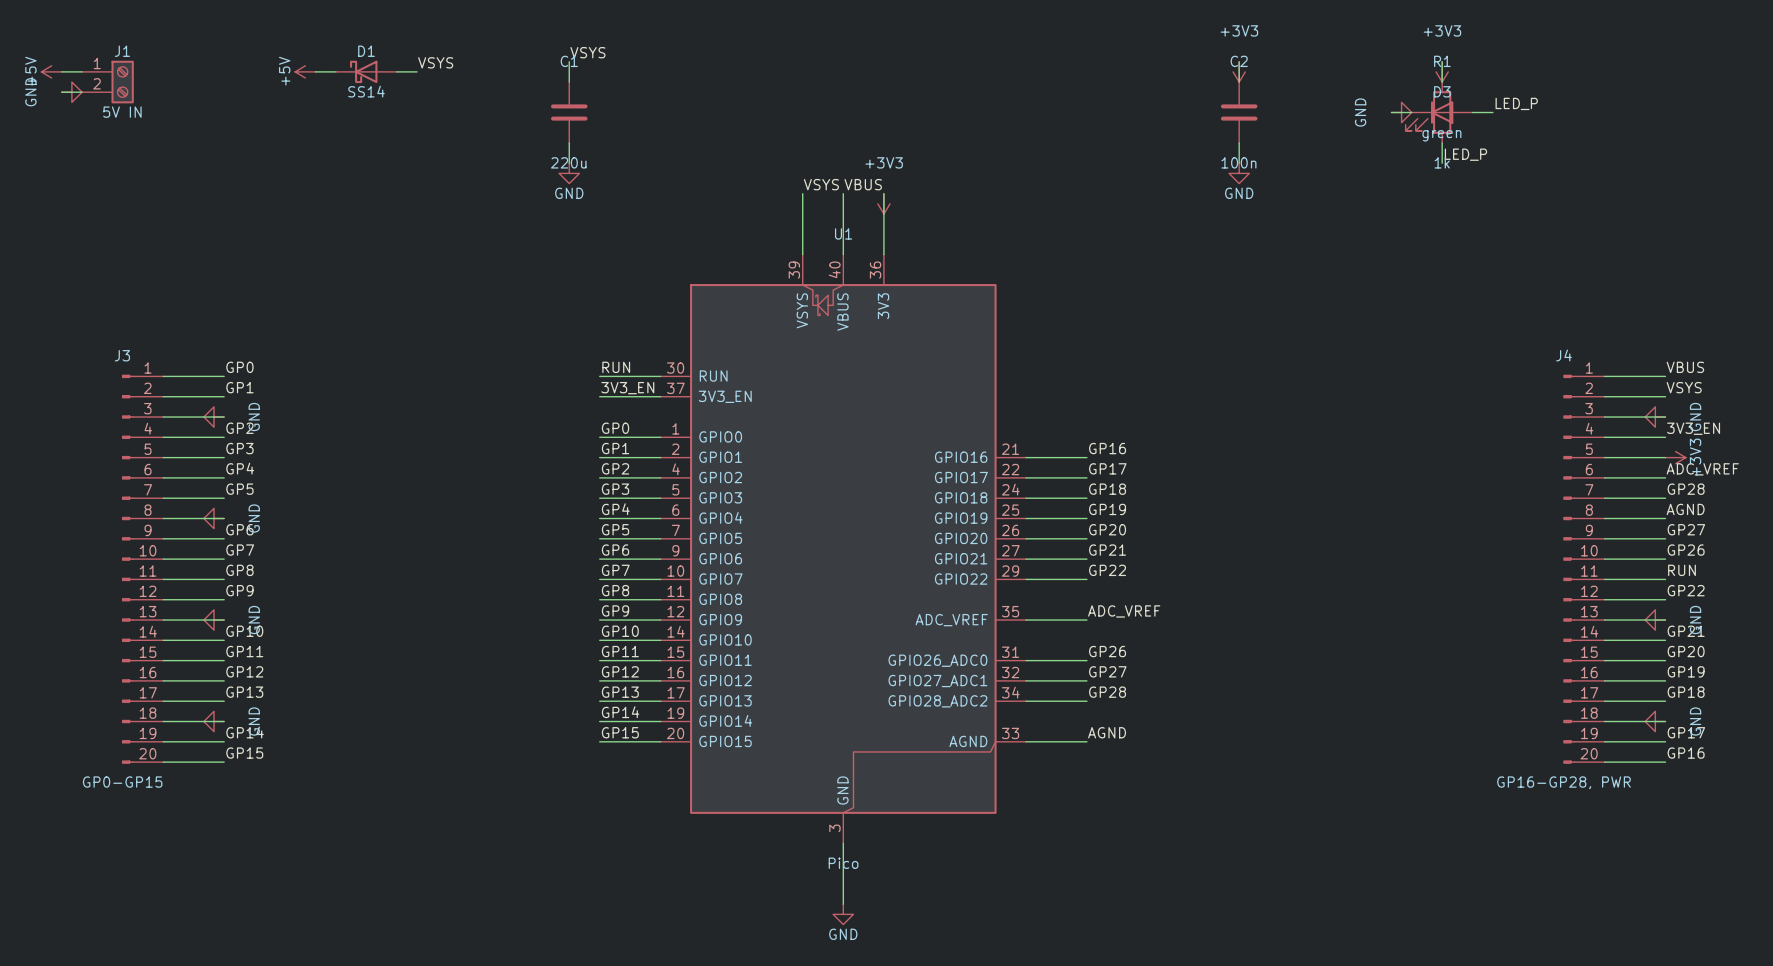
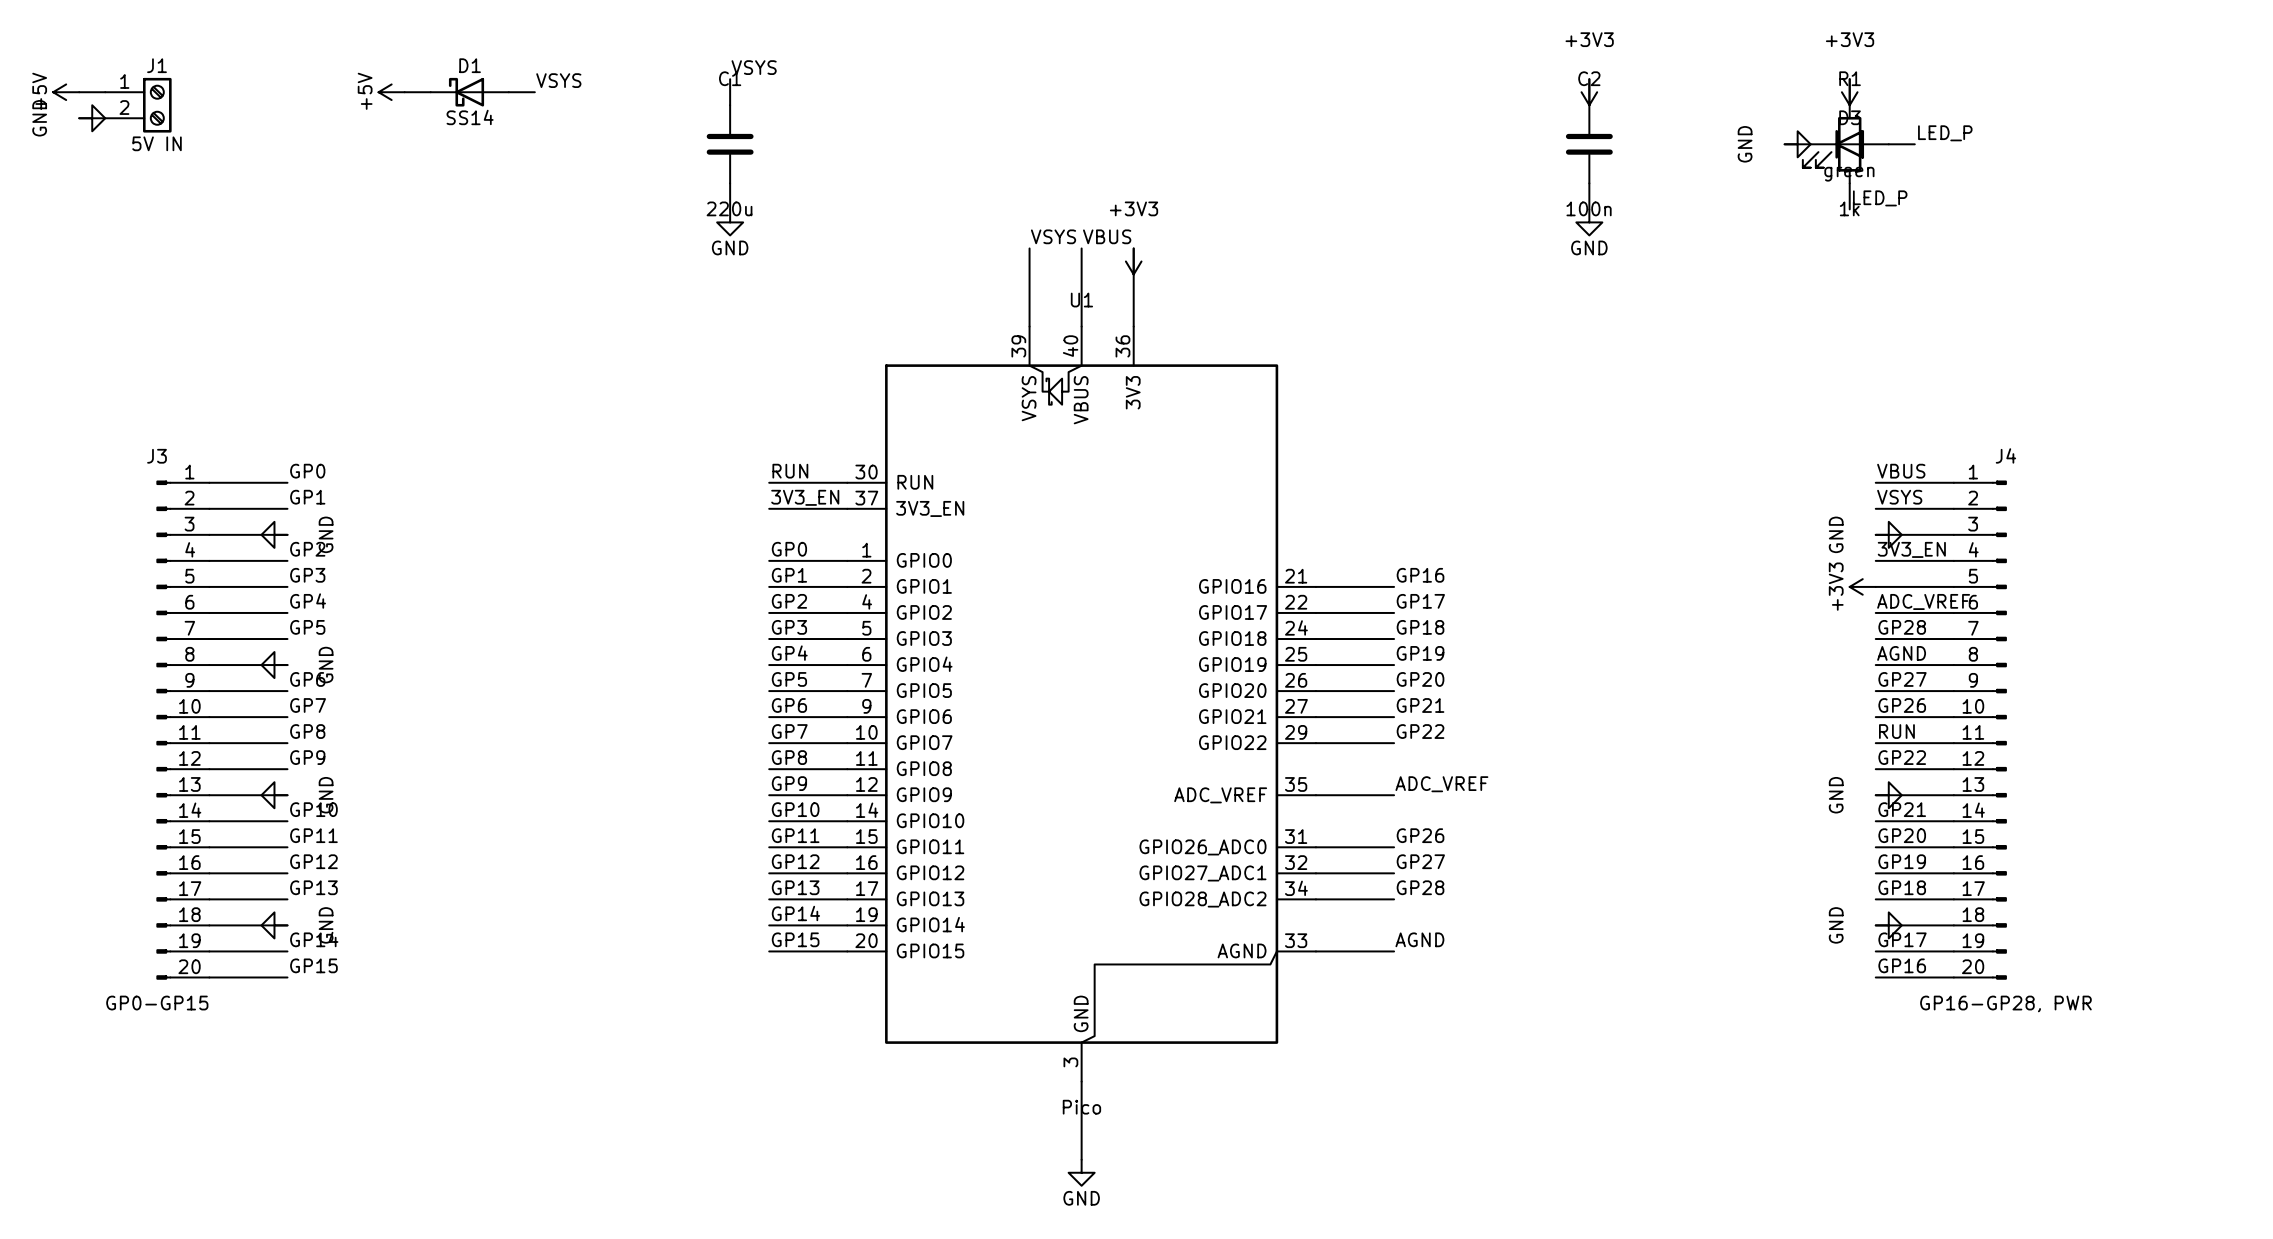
label: none -> VBUS (1901, 471)
label: VBUS (1685, 367) -> none
wire: (1604, 376) (1665, 376) -> (1875, 482) (1953, 482)
label: none -> VSYS (1899, 497)
label: VSYS (1684, 387) -> none
wire: (1604, 396) (1665, 396) -> (1875, 508) (1953, 508)
power symbol: none -> GND (1888, 534)
wire: (1604, 417) (1665, 417) -> (1875, 534) (1953, 534)
power symbol: GND (1655, 417) -> none
label: none -> 3V3_EN (1911, 549)
label: 3V3_EN (1693, 428) -> none
wire: (1604, 437) (1665, 437) -> (1875, 560) (1953, 560)
power symbol: none -> +3V3 (1862, 586)
wire: (1604, 457) (1665, 457) -> (1875, 586) (1953, 586)
power symbol: +3V3 (1675, 457) -> none
label: none -> ADC_VREF (1923, 601)
label: ADC_VREF (1702, 469) -> none
wire: (1604, 477) (1665, 477) -> (1875, 612) (1953, 612)
label: none -> GP28 (1902, 627)
label: GP28 (1686, 489) -> none
wire: (1604, 498) (1665, 498) -> (1875, 639) (1953, 639)
label: none -> AGND (1901, 653)
label: AGND (1685, 509) -> none
wire: (1604, 518) (1665, 518) -> (1875, 665) (1953, 665)
label: none -> GP27 (1902, 679)
label: GP27 (1686, 529) -> none
wire: (1604, 538) (1665, 538) -> (1875, 691) (1953, 691)
label: none -> GP26 (1902, 705)
label: GP26 (1686, 550) -> none
wire: (1604, 559) (1665, 559) -> (1875, 717) (1953, 717)
J4 flip: as is (1569, 569) -> left-right (1999, 730)
label: none -> RUN (1896, 731)
label: RUN (1682, 570) -> none
wire: (1604, 579) (1665, 579) -> (1875, 743) (1953, 743)
label: none -> GP22 (1902, 757)
label: GP22 (1686, 590) -> none
wire: (1604, 599) (1665, 599) -> (1875, 769) (1953, 769)
power symbol: none -> GND (1888, 795)
wire: (1604, 620) (1665, 620) -> (1875, 795) (1953, 795)
power symbol: GND (1655, 620) -> none
label: none -> GP21 (1902, 809)
label: GP21 (1686, 631) -> none
wire: (1604, 640) (1665, 640) -> (1875, 821) (1953, 821)
label: none -> GP20 (1902, 835)
label: GP20 (1686, 651) -> none
wire: (1604, 660) (1665, 660) -> (1875, 847) (1953, 847)
label: none -> GP19 (1902, 861)
label: GP19 (1686, 671) -> none
wire: (1604, 680) (1665, 680) -> (1875, 873) (1953, 873)
label: none -> GP18 (1902, 887)
label: GP18 (1686, 692) -> none
wire: (1604, 701) (1665, 701) -> (1875, 899) (1953, 899)
power symbol: none -> GND (1888, 925)
wire: (1604, 721) (1665, 721) -> (1875, 925) (1953, 925)
power symbol: GND (1655, 721) -> none
label: none -> GP17 (1902, 939)
label: GP17 (1686, 732) -> none
wire: (1604, 741) (1665, 741) -> (1875, 951) (1953, 951)
label: none -> GP16 (1902, 965)
label: GP16 (1686, 753) -> none
wire: (1604, 762) (1665, 762) -> (1875, 977) (1953, 977)

